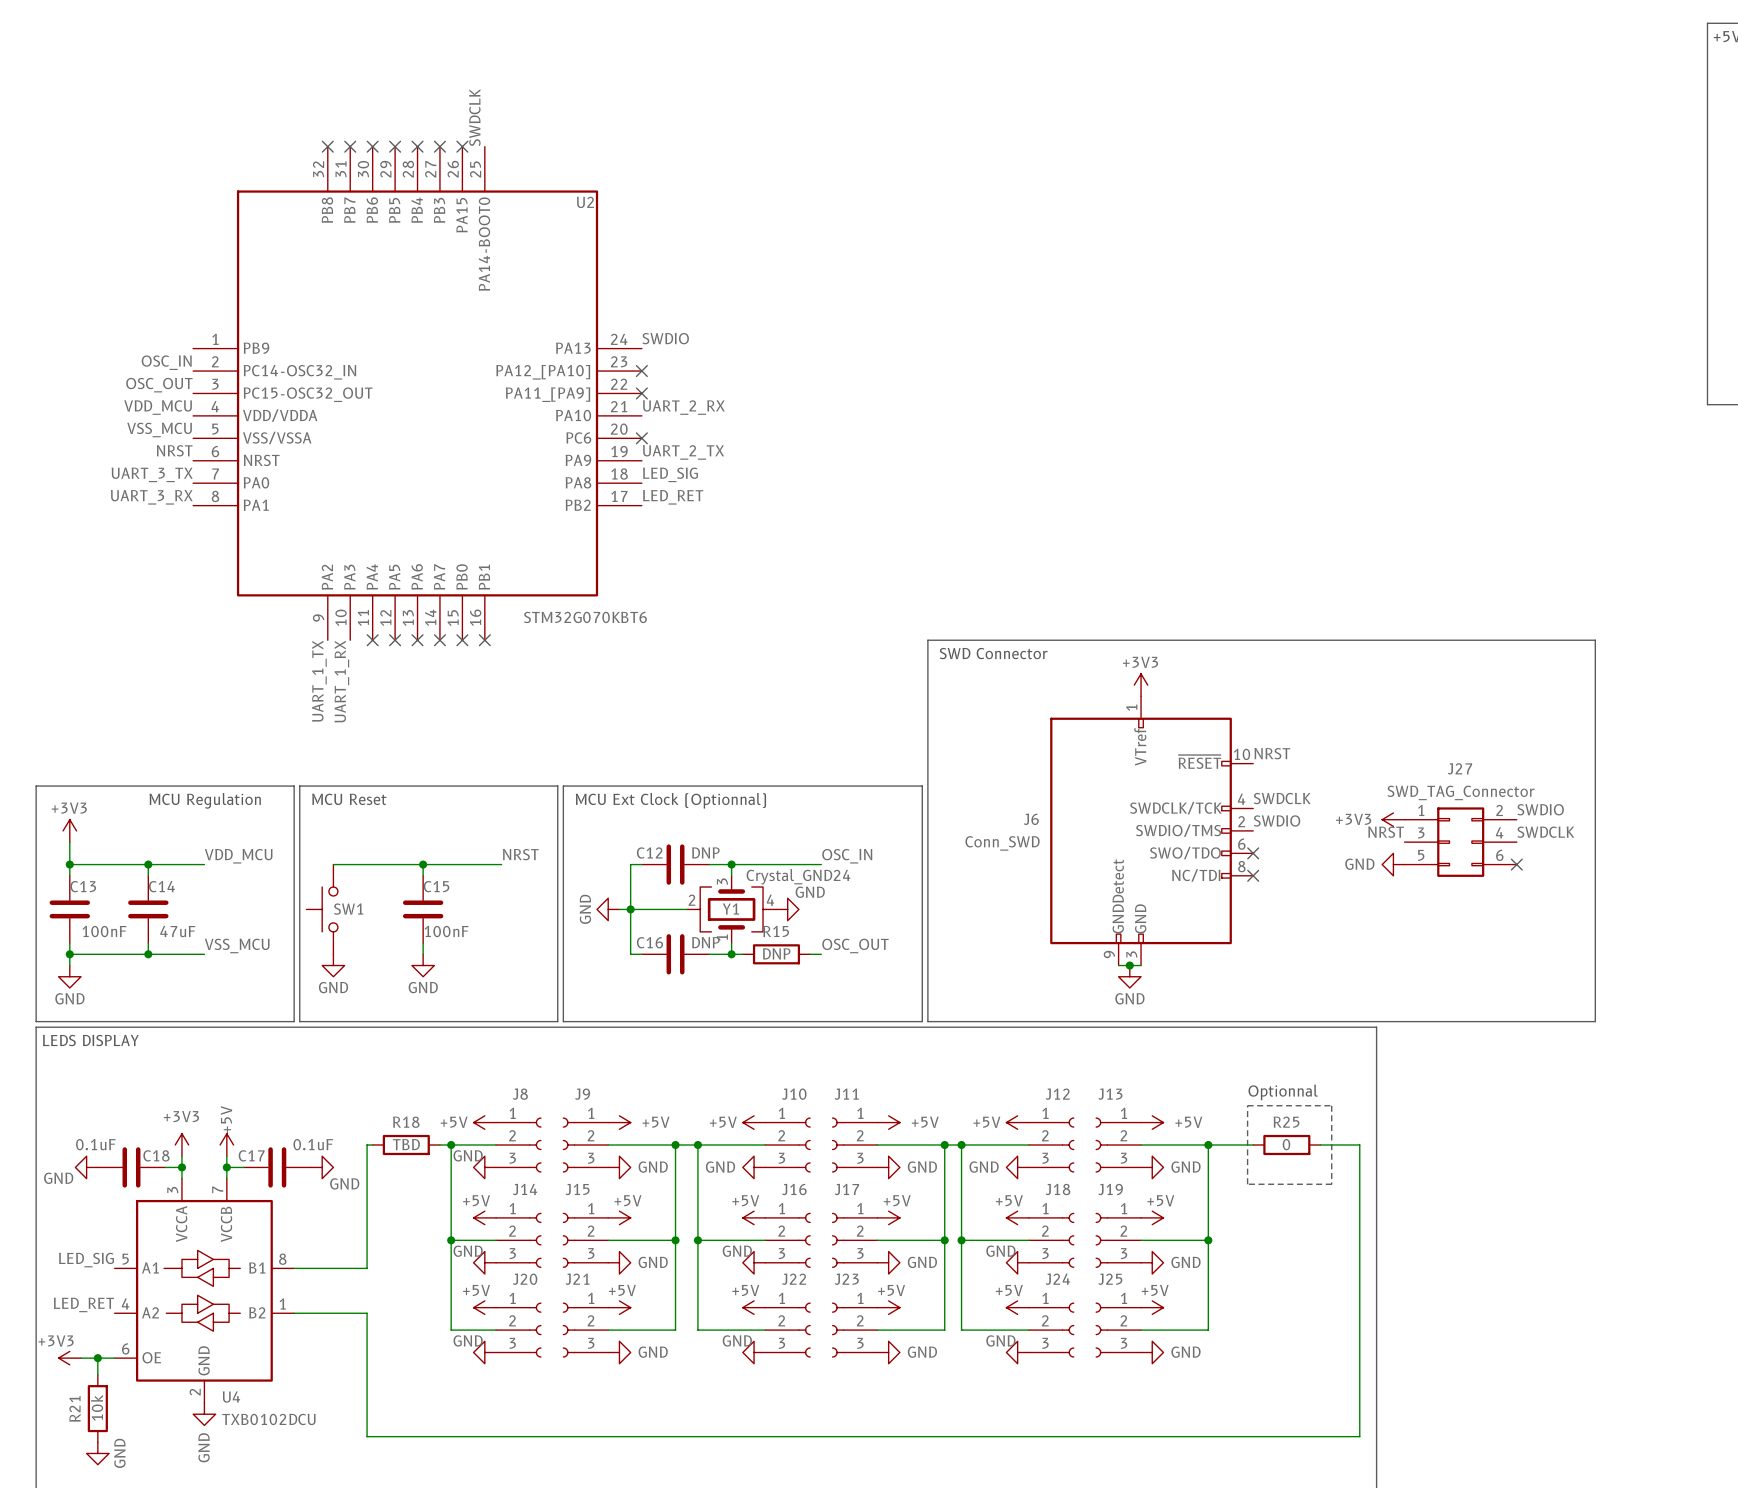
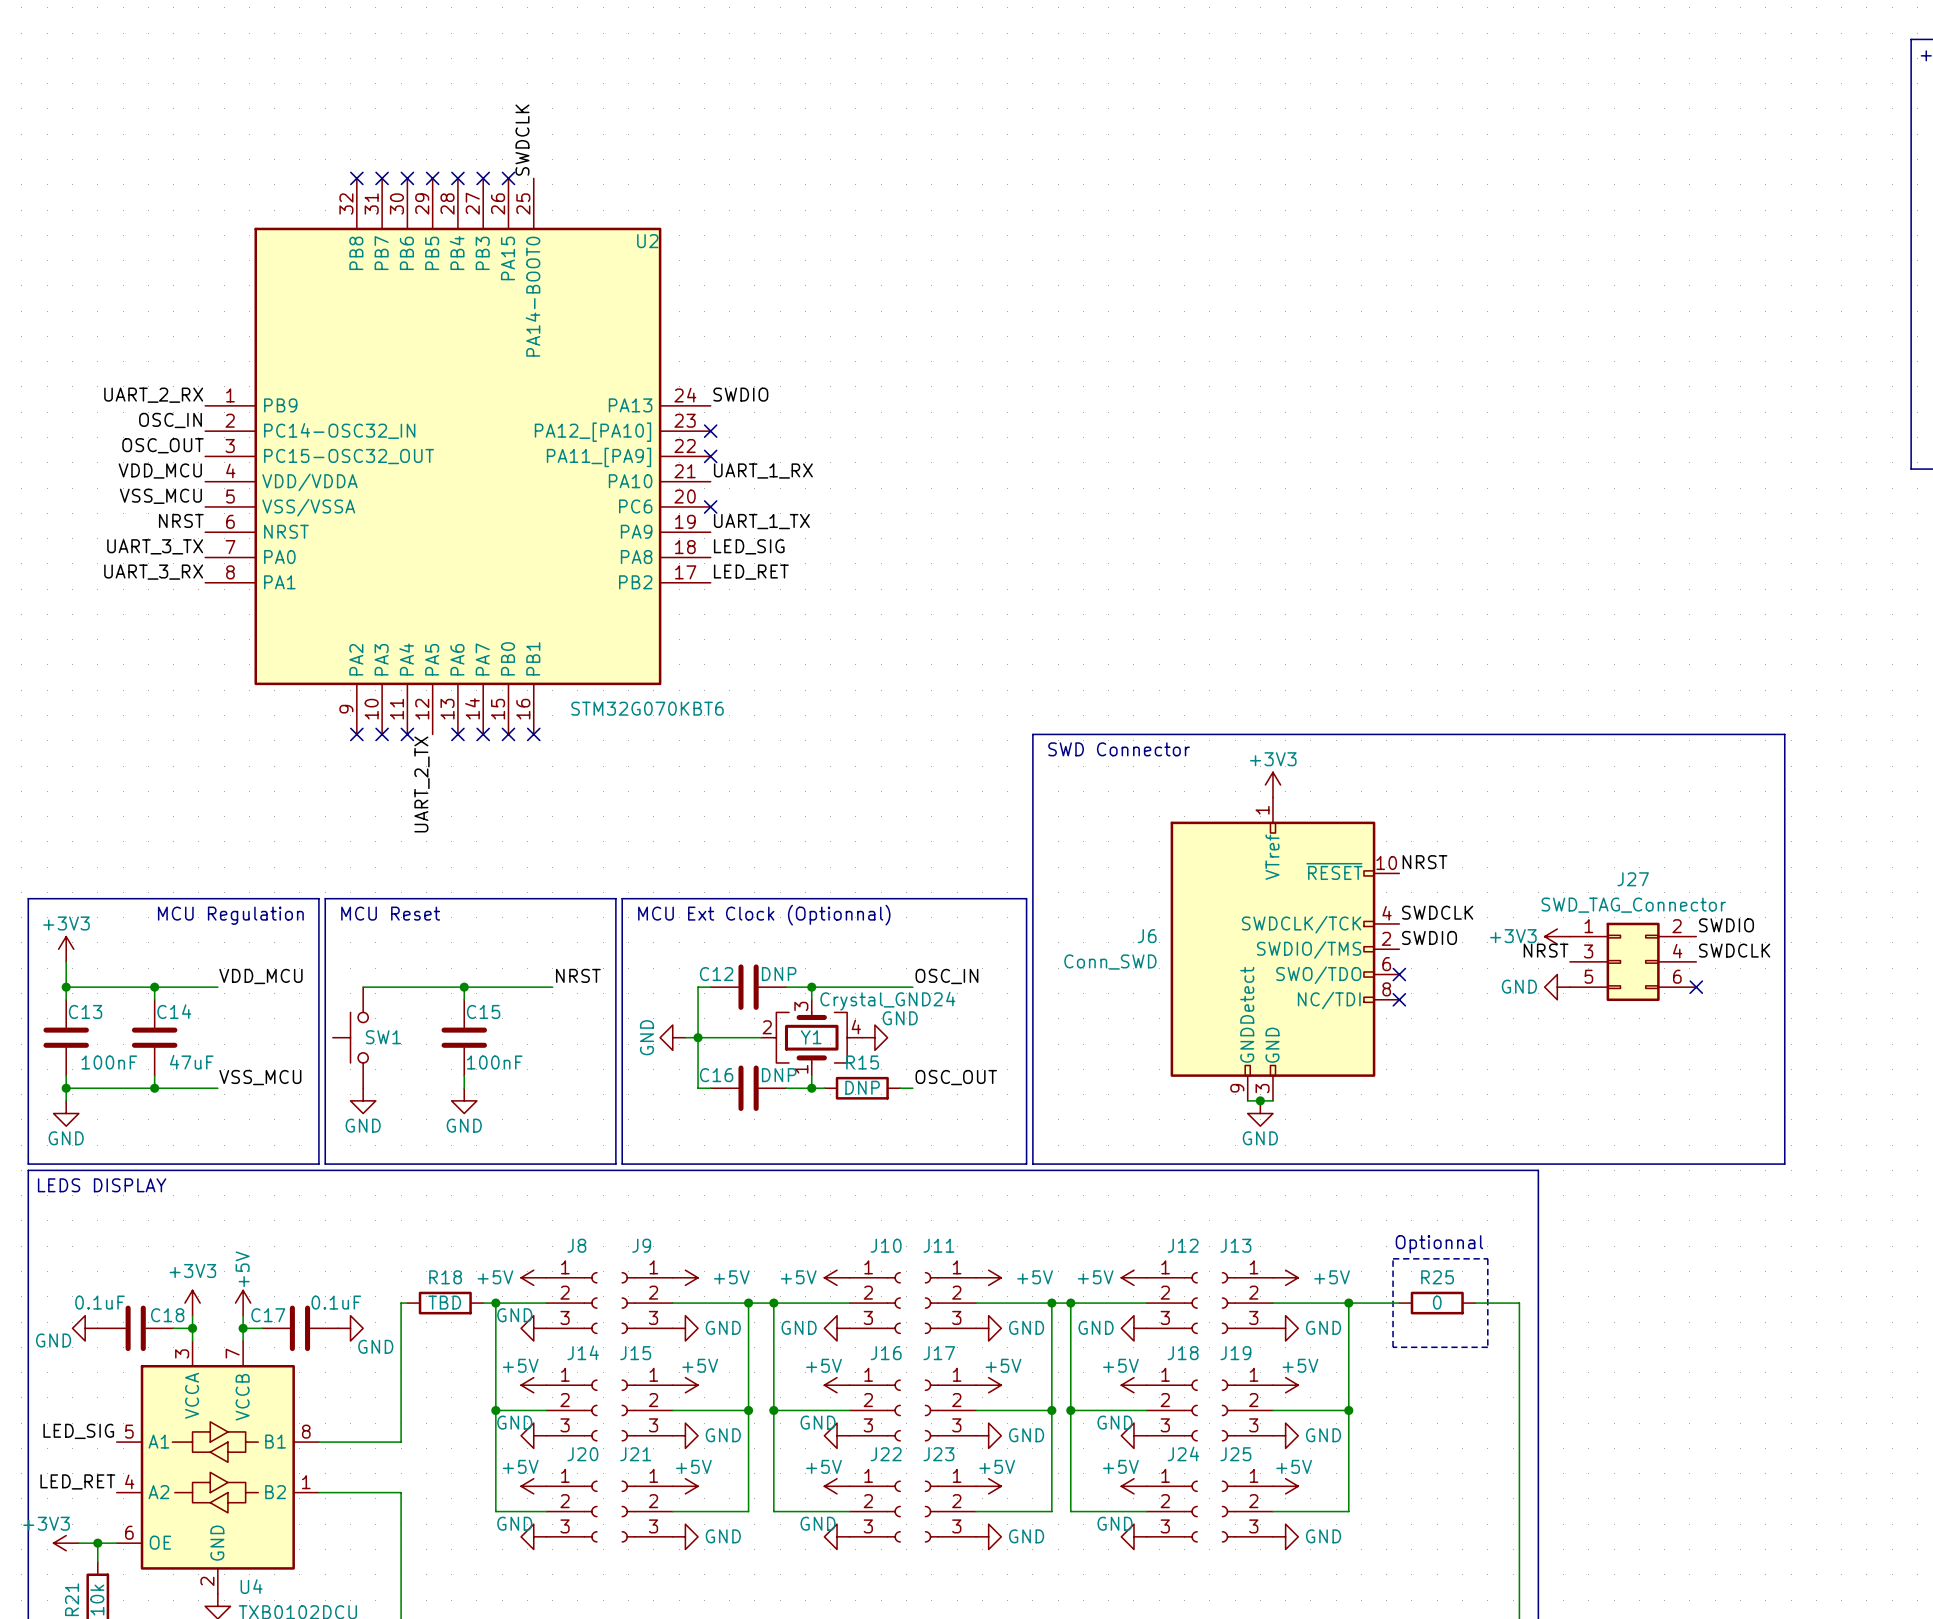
label: none -> UART_2_RX (153, 395)
label: UART_2_RX (683, 407) -> UART_1_RX (763, 471)
label: UART_2_TX (683, 452) -> UART_1_TX (761, 521)
no-connect mark: none -> (356, 734)
no-connect mark: none -> (382, 734)
no-connect mark: (395, 640) -> none
label: UART_1_TX (319, 681) -> none
label: UART_1_RX (341, 681) -> none
label: none -> UART_2_TX (421, 784)

